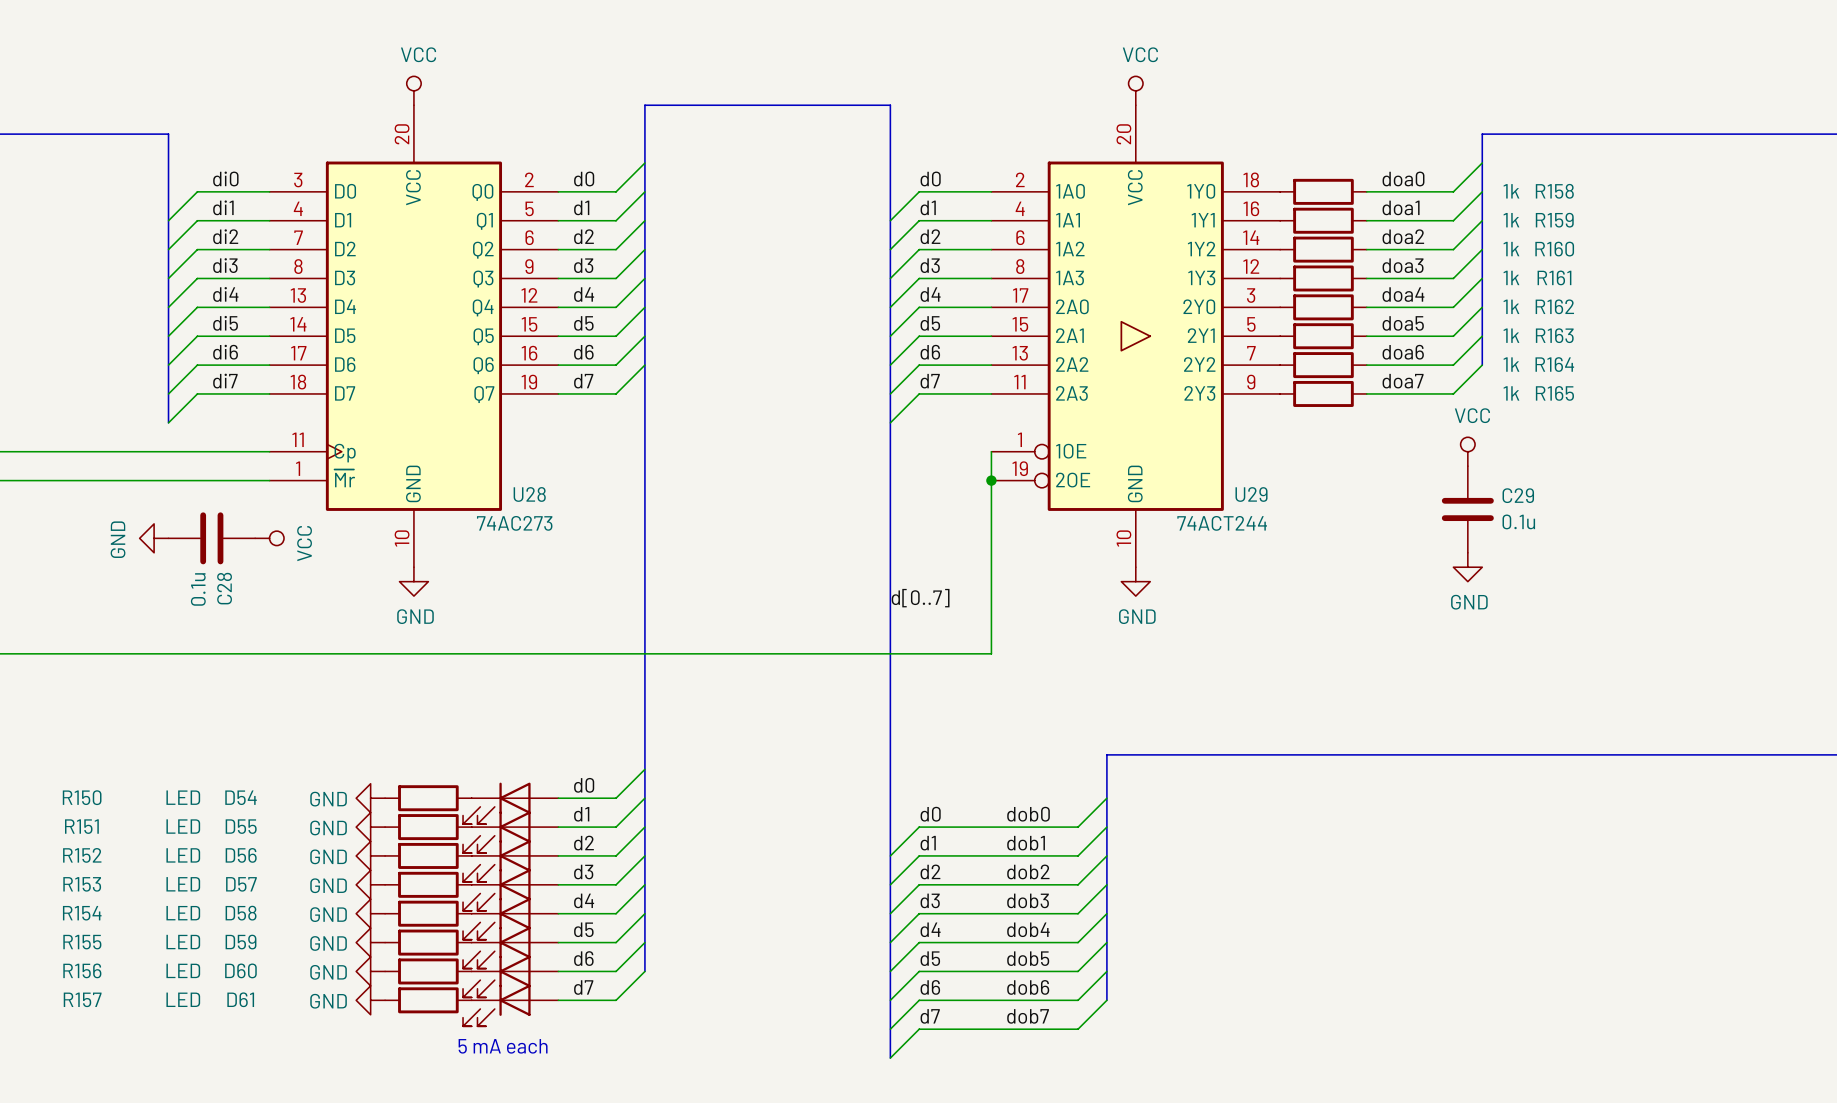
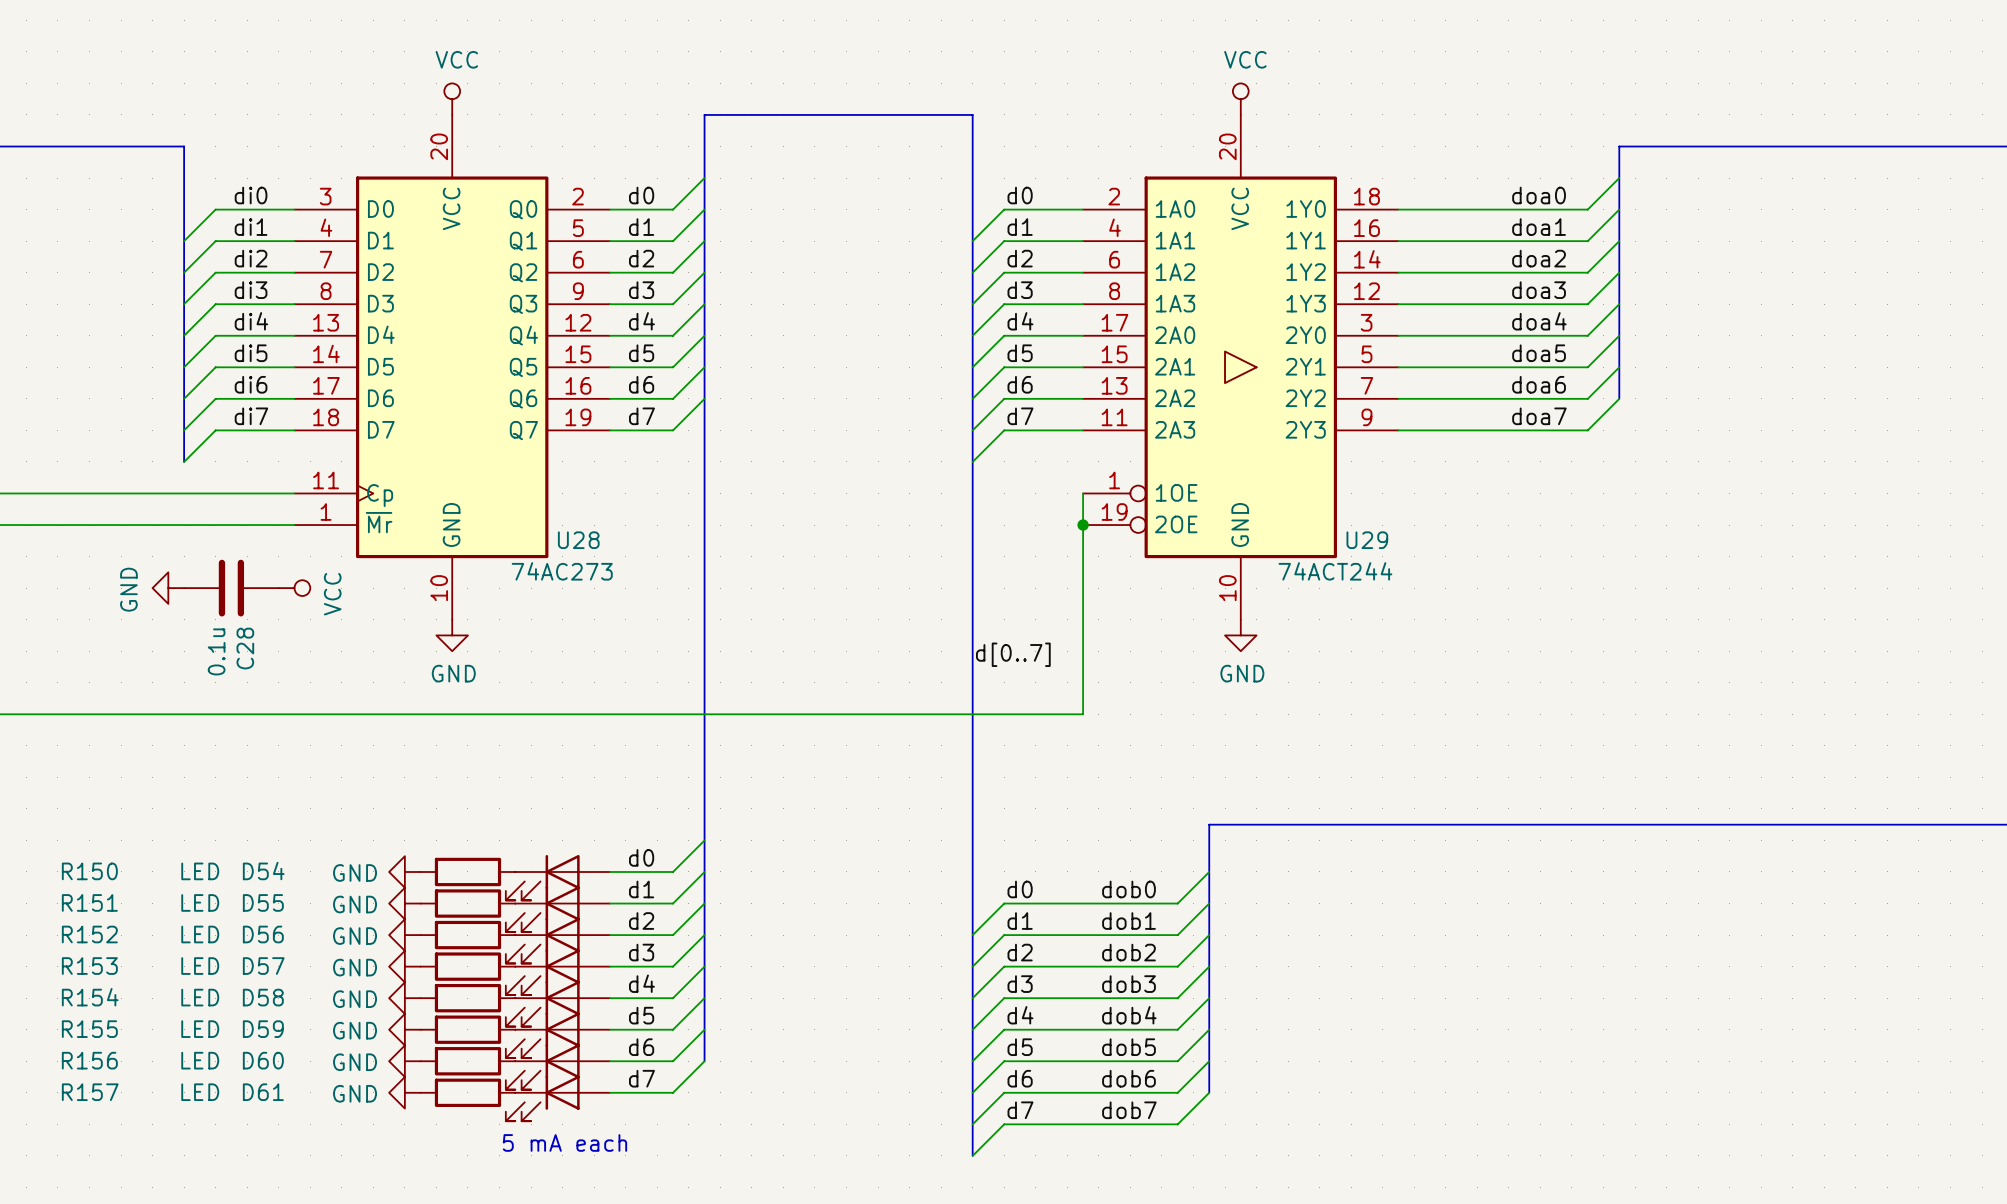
wire: none -> (1398, 209) (1493, 209)
R158: 1k (1323, 191) -> none
wire: none -> (1398, 241) (1493, 241)
R159: 1k (1323, 220) -> none
wire: none -> (1398, 272) (1493, 272)
R160: 1k (1323, 249) -> none
wire: none -> (1398, 304) (1493, 304)
R161: 1k (1323, 278) -> none
wire: none -> (1398, 335) (1493, 335)
R162: 1k (1323, 307) -> none
wire: none -> (1398, 367) (1493, 367)
R163: 1k (1323, 336) -> none
wire: none -> (1398, 398) (1493, 398)
R164: 1k (1323, 365) -> none
wire: none -> (1398, 430) (1493, 430)
R165: 1k (1323, 393) -> none
power symbol: VCC (1467, 451) -> none
C29: 0.1u (1467, 509) -> none
power symbol: GND (1467, 567) -> none

